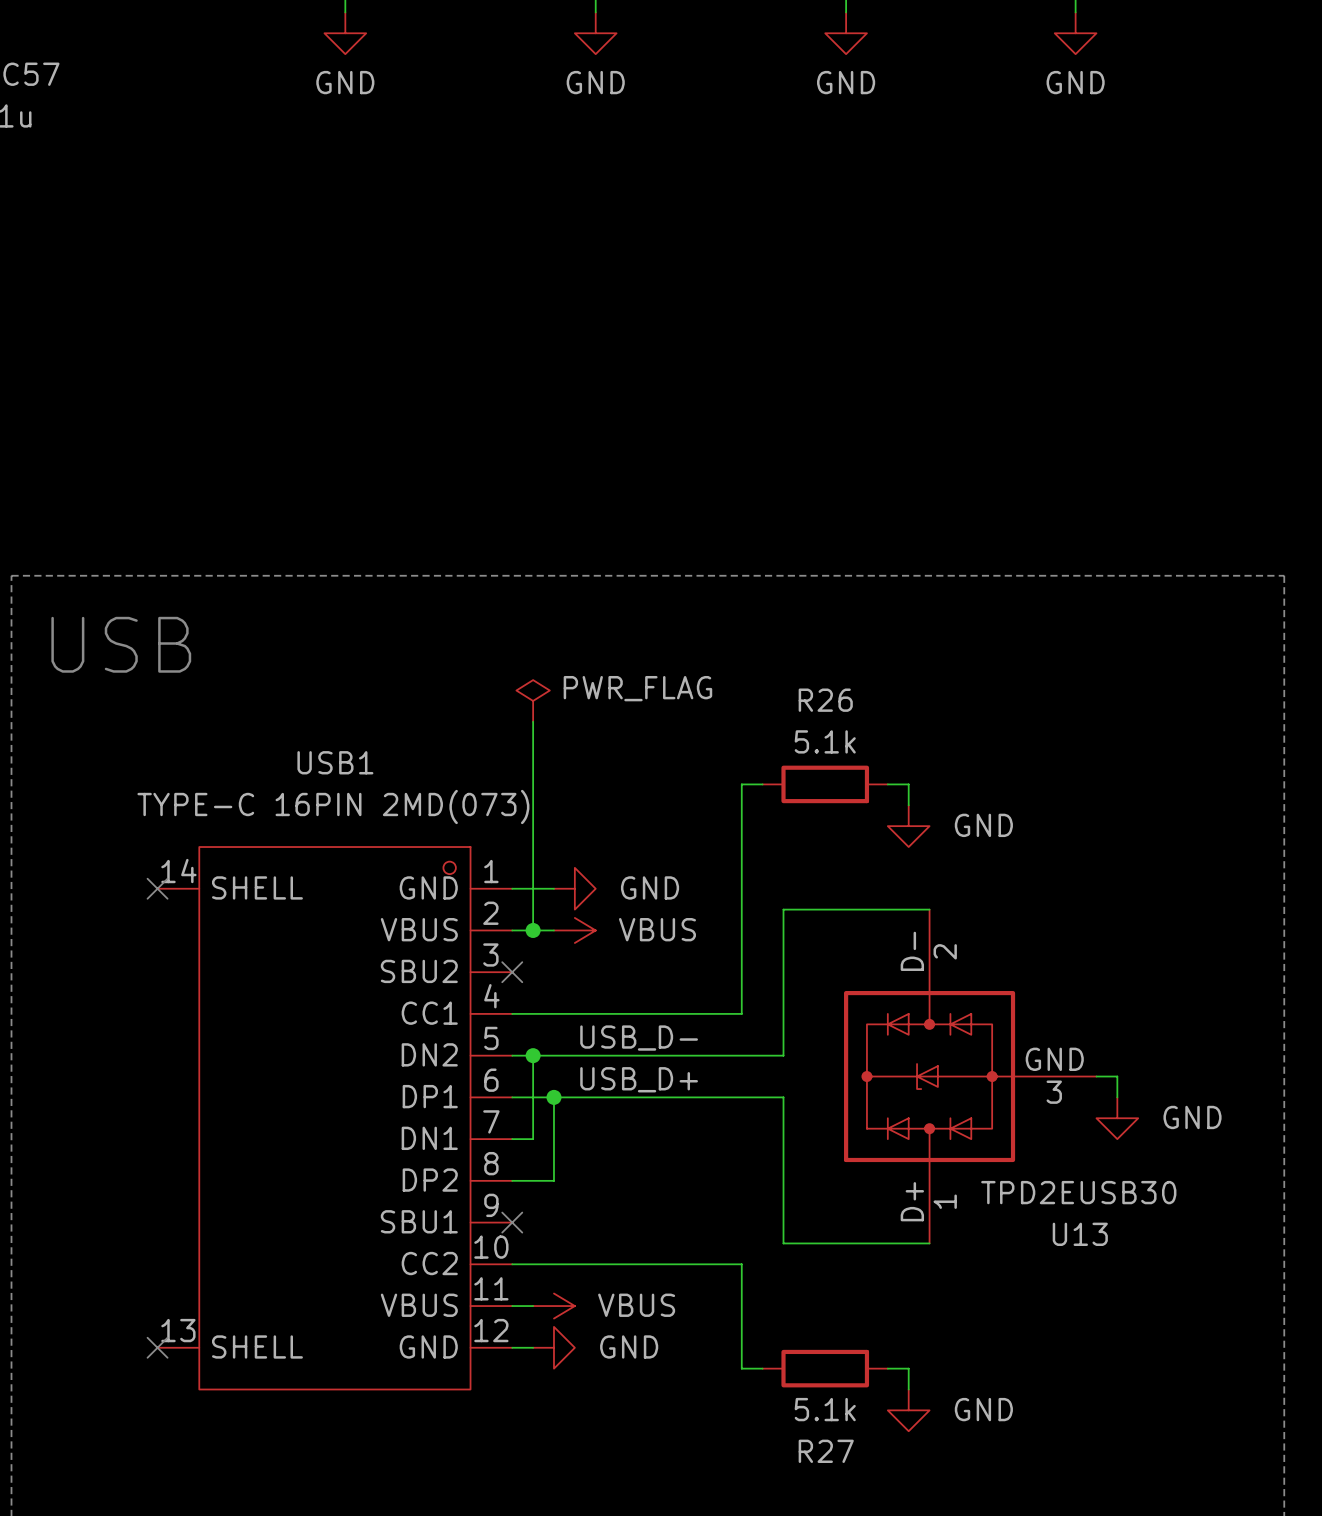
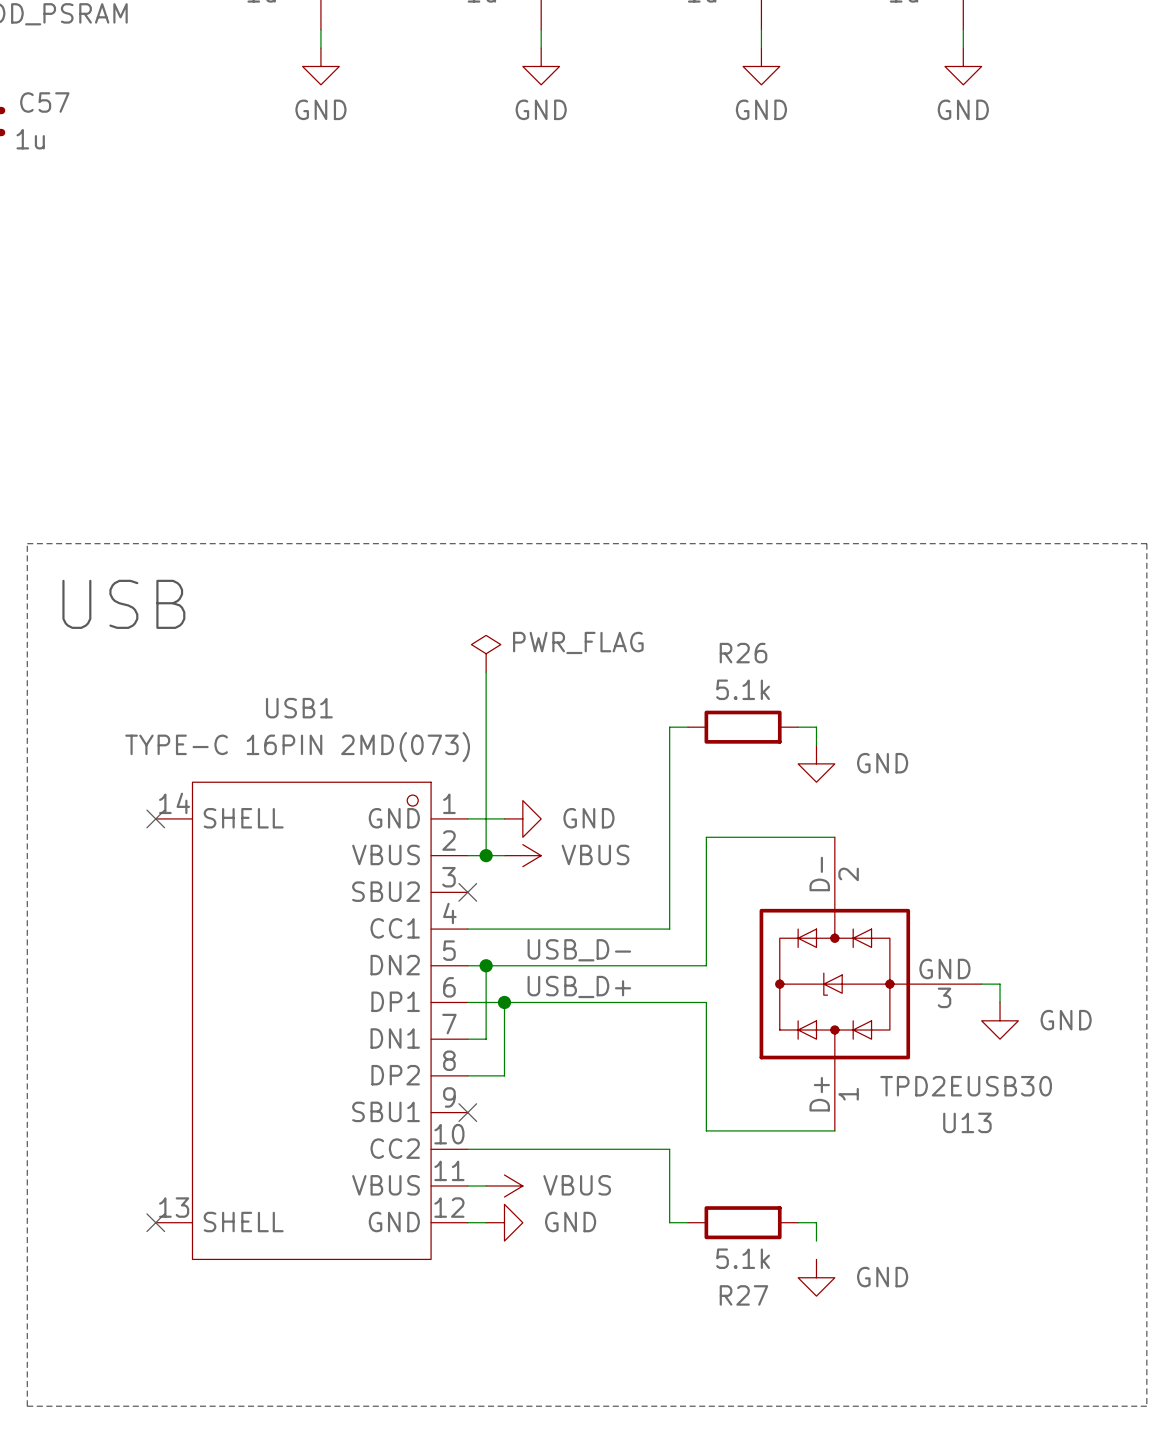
USB1 name position: USB1 (335, 762) -> USB1 (299, 708)
USB1 value position: TYPE-C 16PIN 2MD(073) (333, 806) -> TYPE-C 16PIN 2MD(073) (297, 747)
wire: (741, 1347) (741, 1368) (762, 1368) -> (669, 1222) (688, 1222)
R27 position: (825, 1368) -> (743, 1222)
wire: (887, 1368) (908, 1368) (908, 1389) -> (798, 1222) (816, 1222) (816, 1241)

